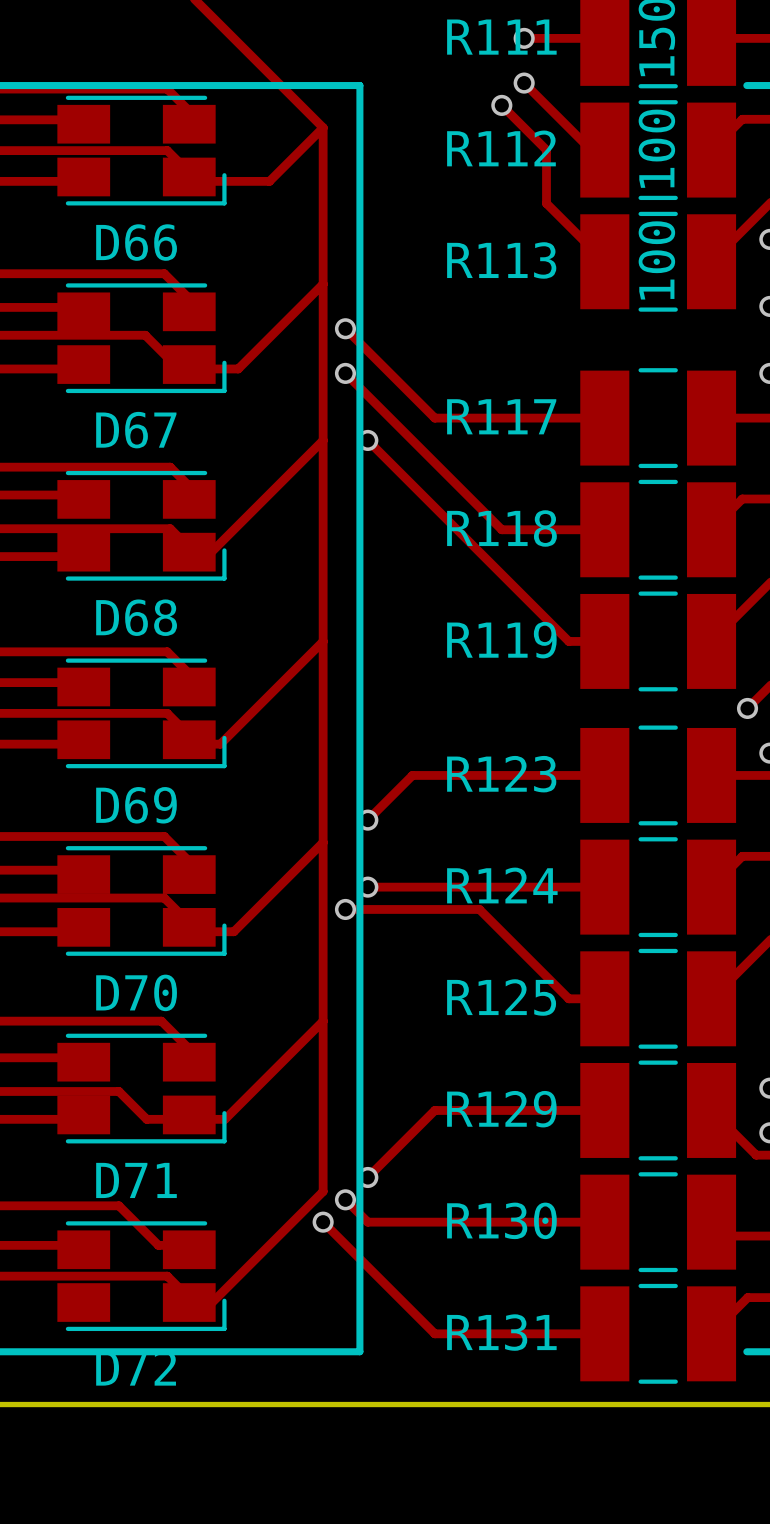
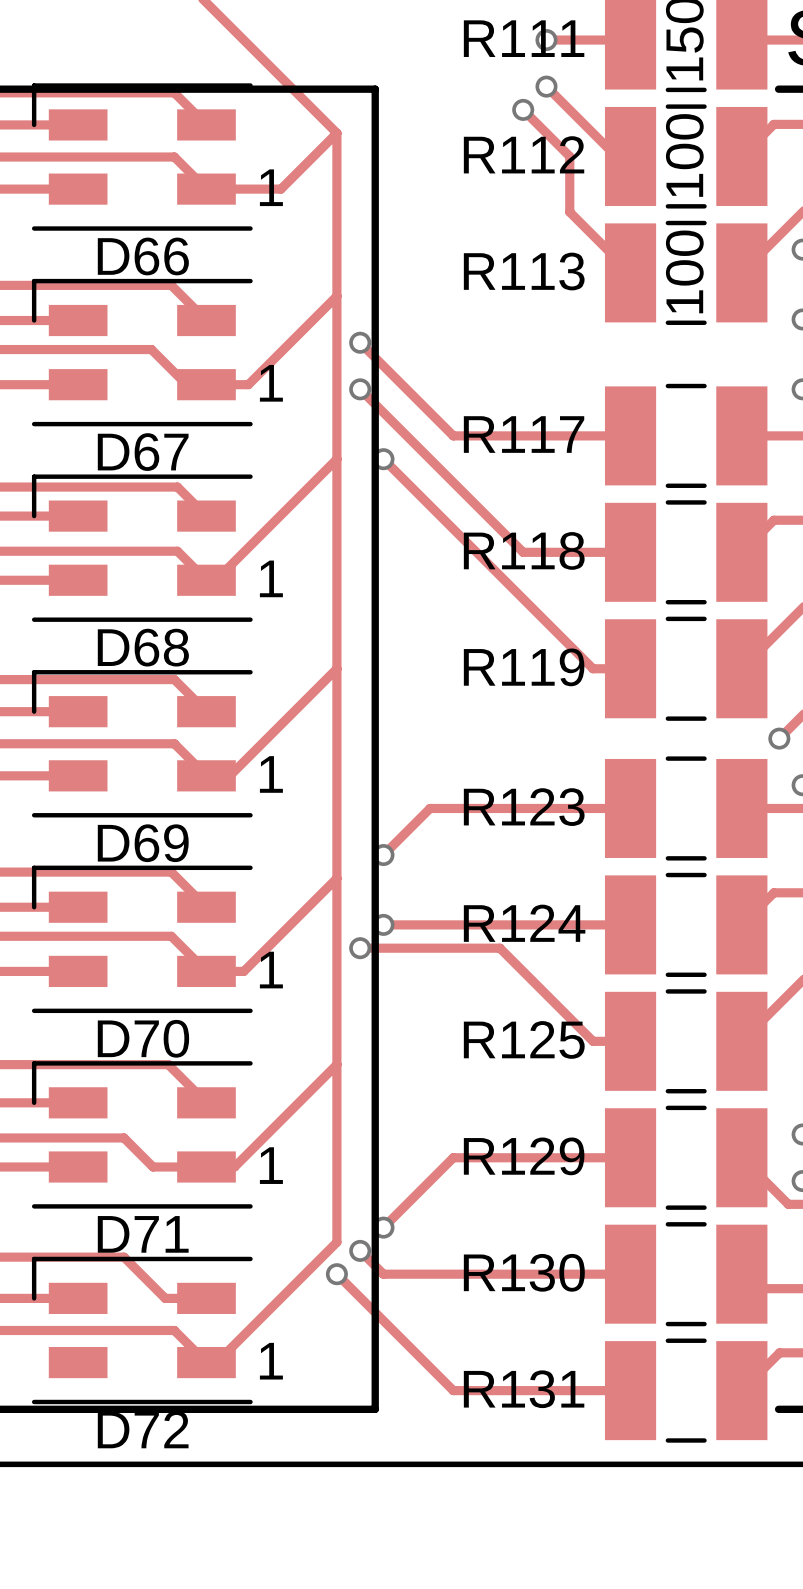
D66 footprint: [57, 95, 227, 206] -> [31, 83, 253, 231]
D67 footprint: [57, 283, 227, 394] -> [31, 278, 253, 427]
D68 footprint: [57, 470, 227, 581] -> [31, 474, 253, 622]
D69 footprint: [57, 658, 227, 769] -> [31, 670, 253, 818]
D70 footprint: [57, 846, 227, 956] -> [31, 865, 253, 1014]
D71 footprint: [57, 1033, 227, 1144] -> [31, 1061, 253, 1209]
D72 footprint: [57, 1221, 227, 1332] -> [31, 1256, 253, 1405]

